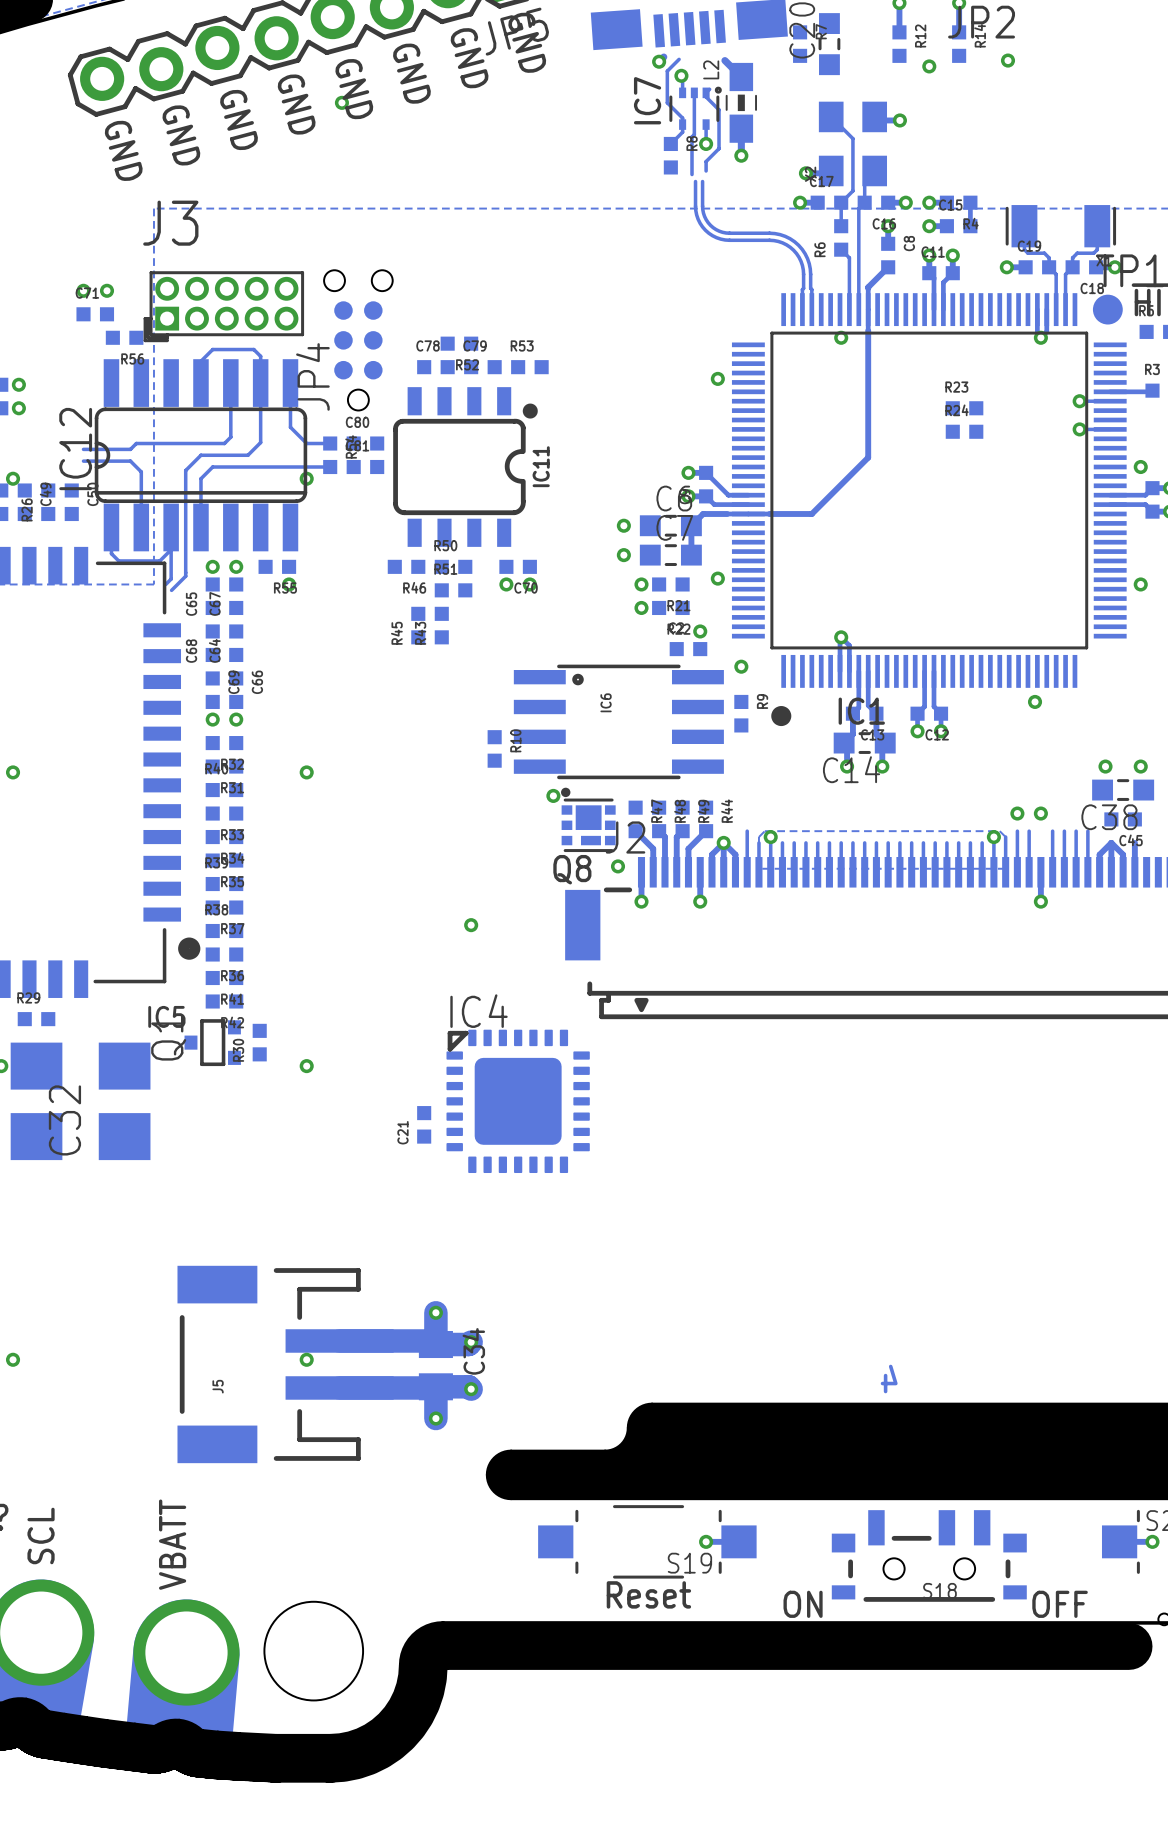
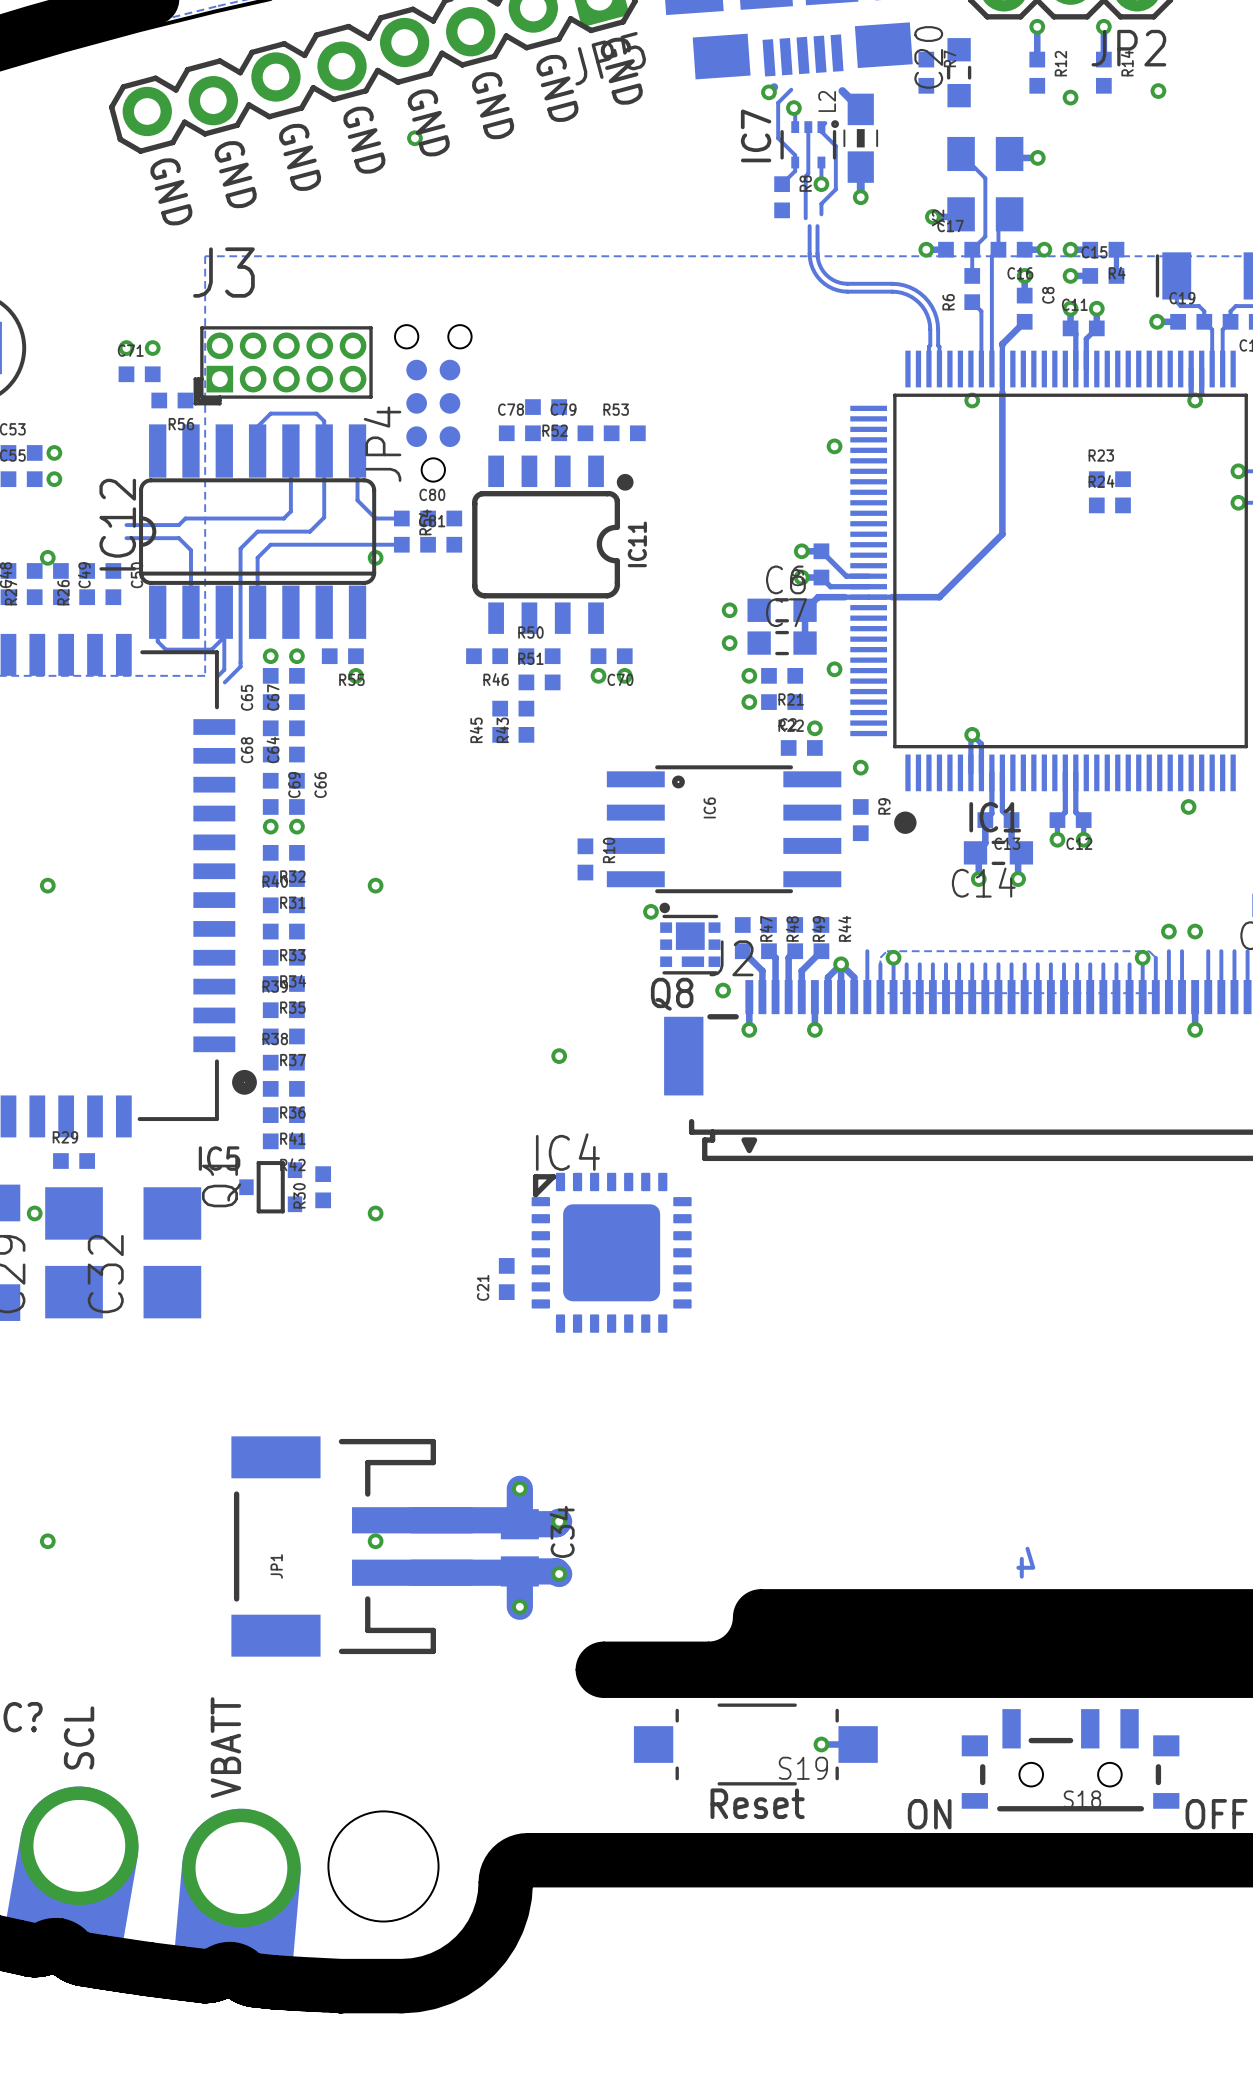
J5 name: J5 (218, 1386) -> JP1 (276, 1566)

